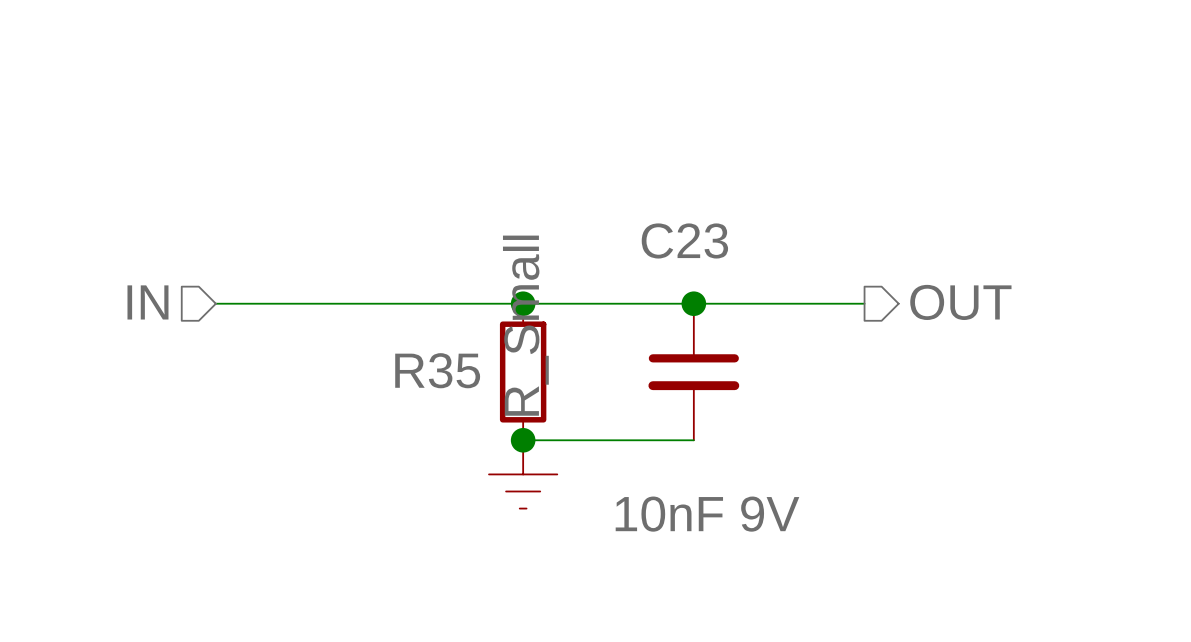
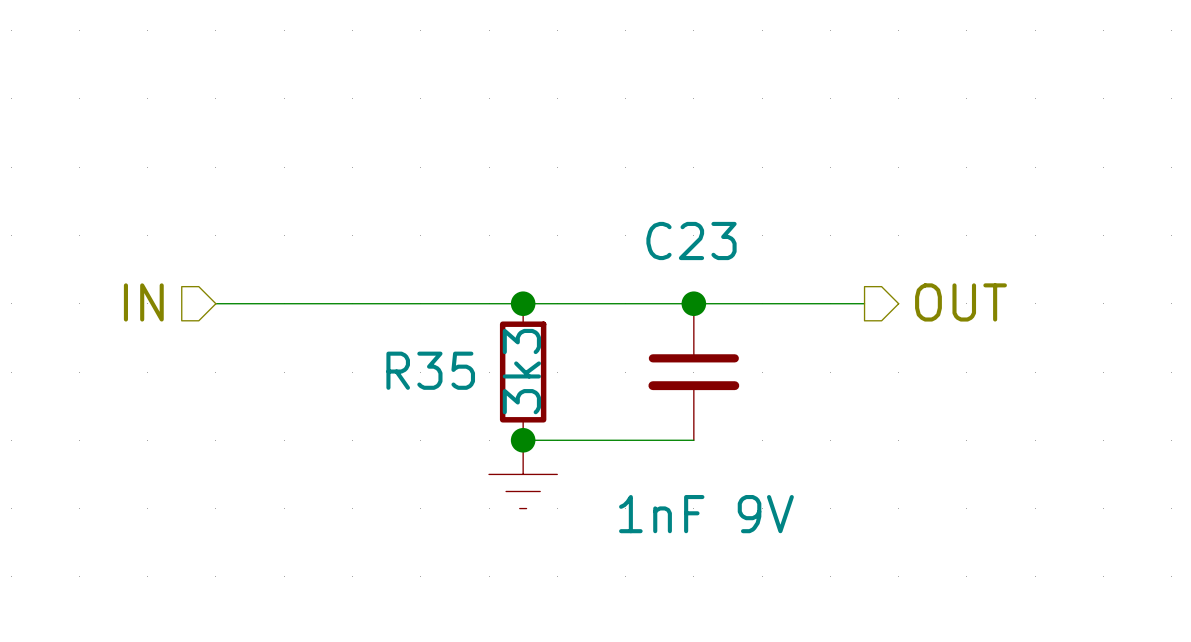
R35 value: R_Small (525, 325) -> 3k3 (521, 371)
C23 value: 10nF 9V (707, 514) -> 1nF 9V (706, 514)

